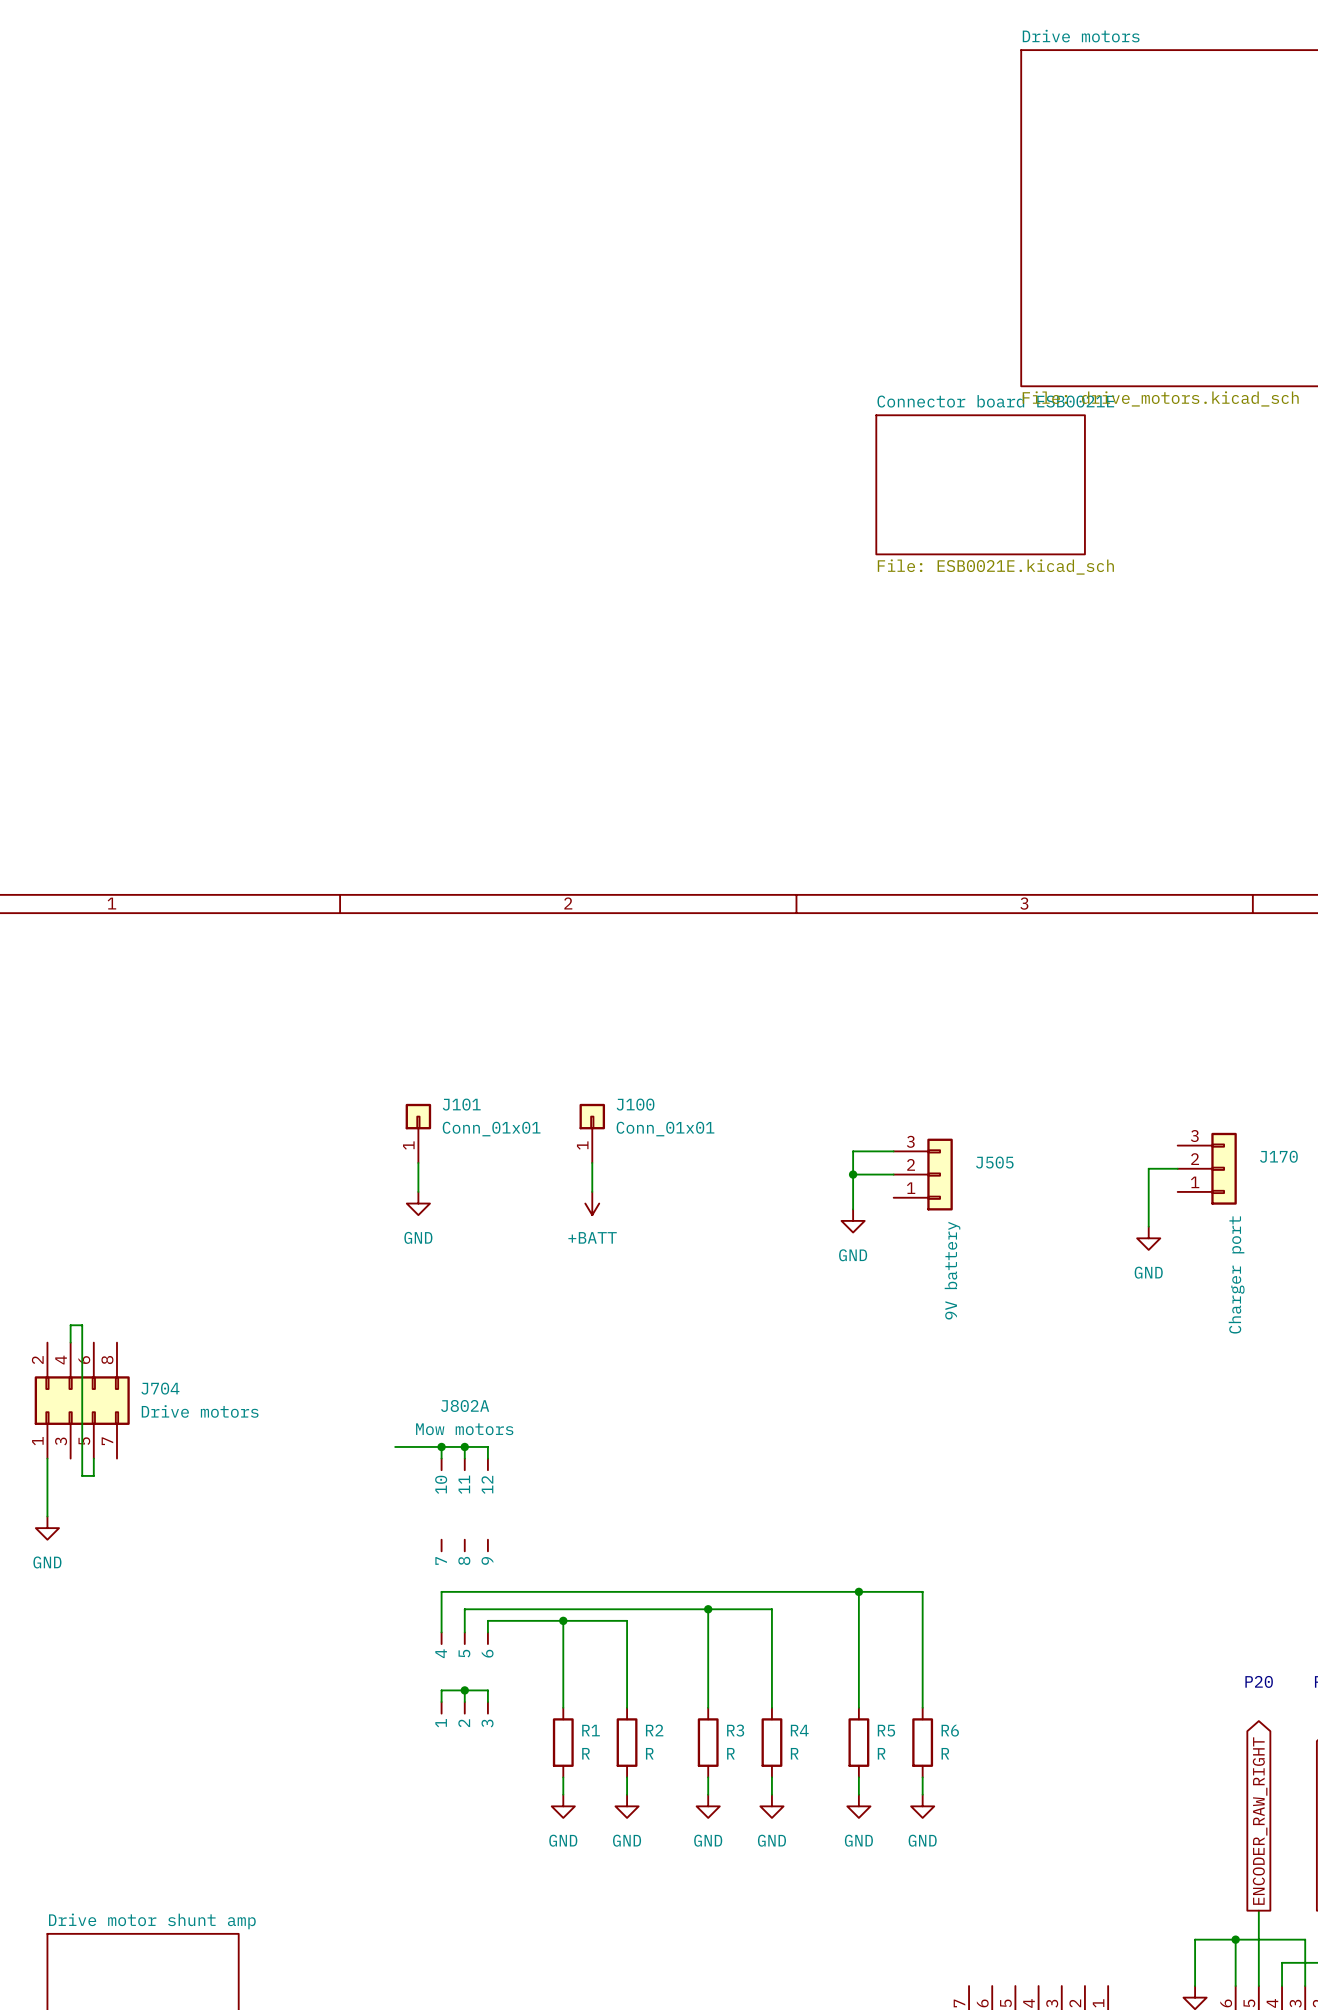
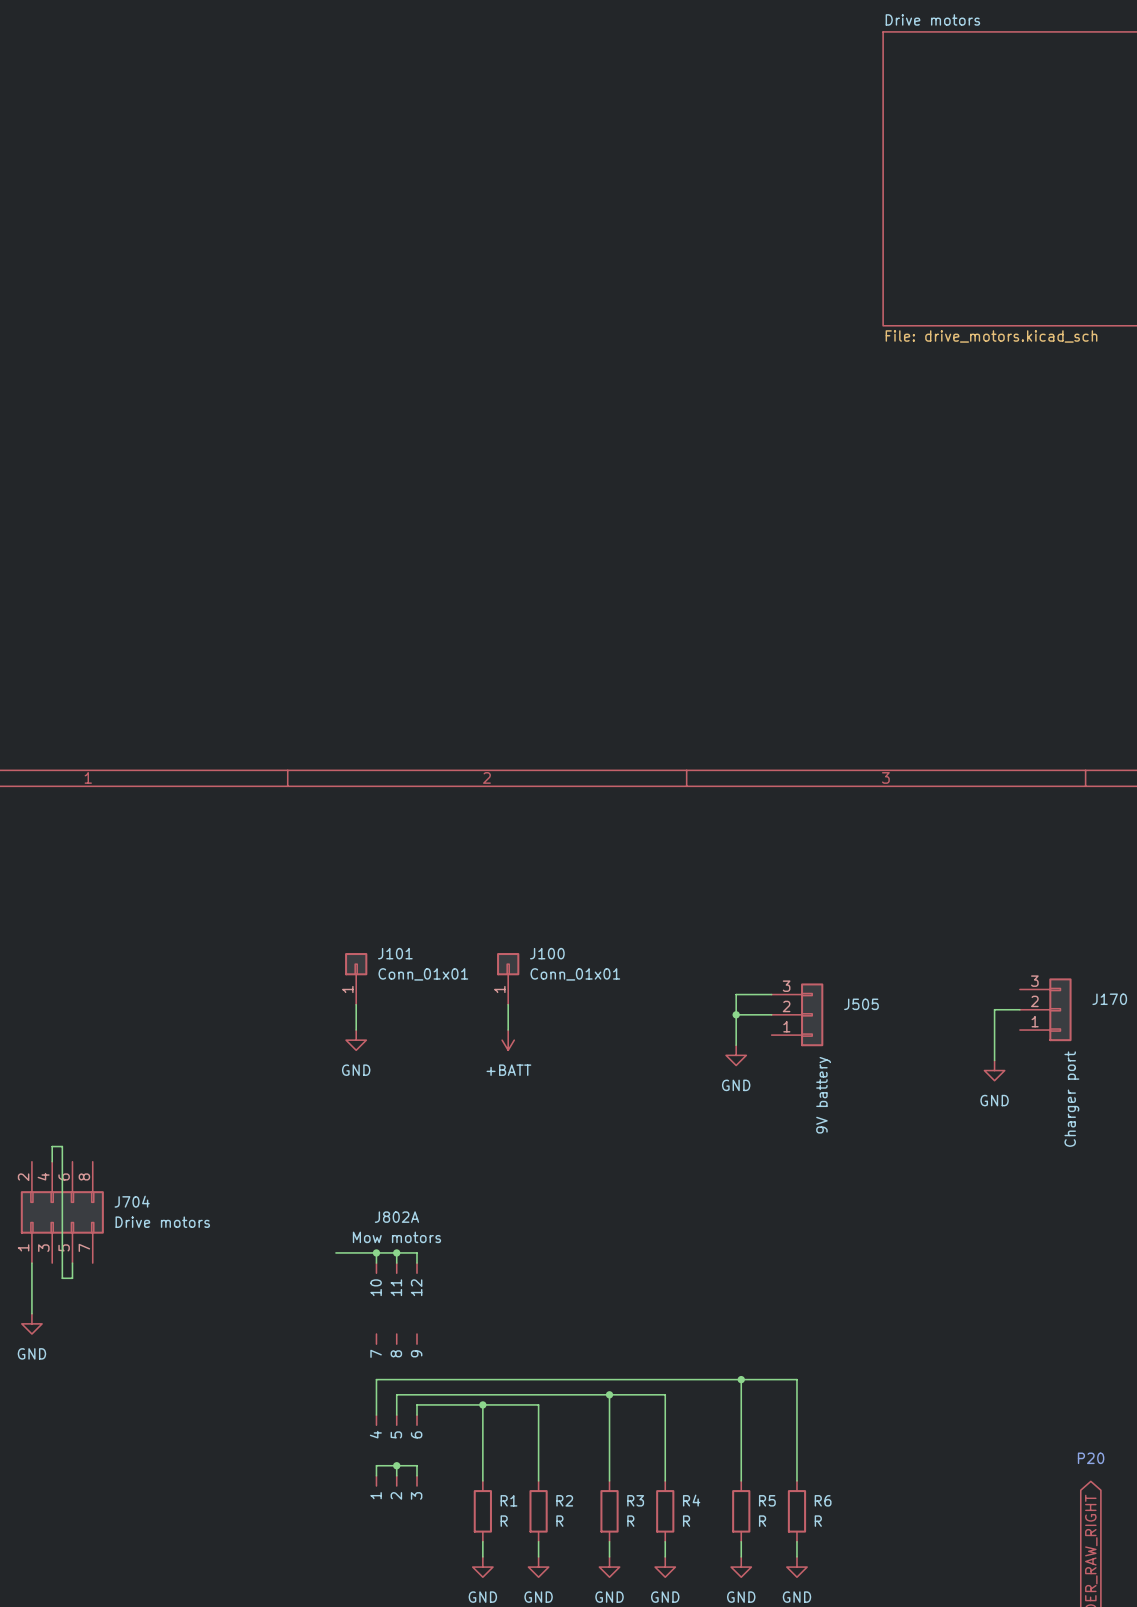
sheet Connector board ESB0021E: File: ESB0021E.kicad_sch (980, 484) -> none

